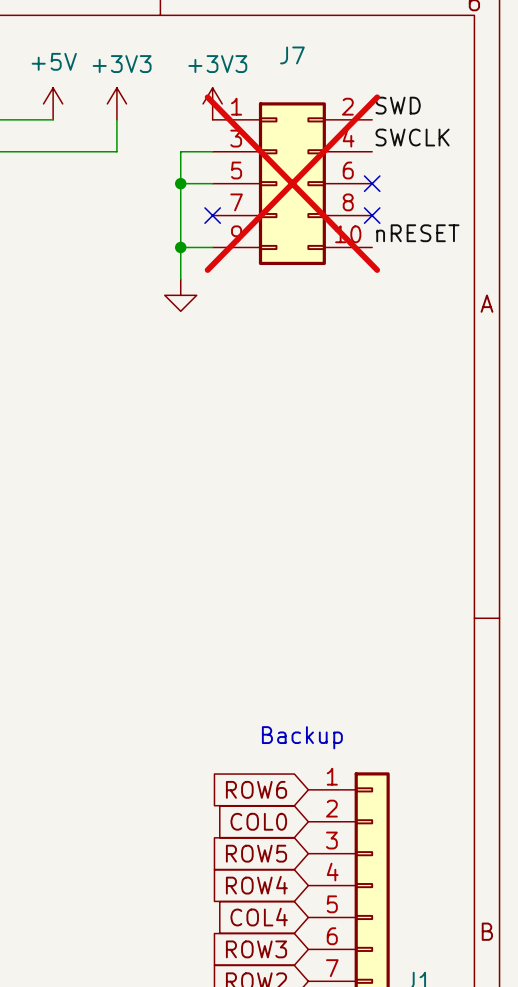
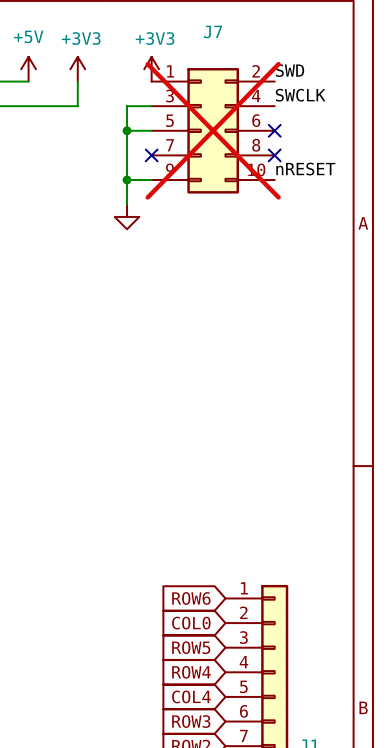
text: Backup (302, 737) -> none

